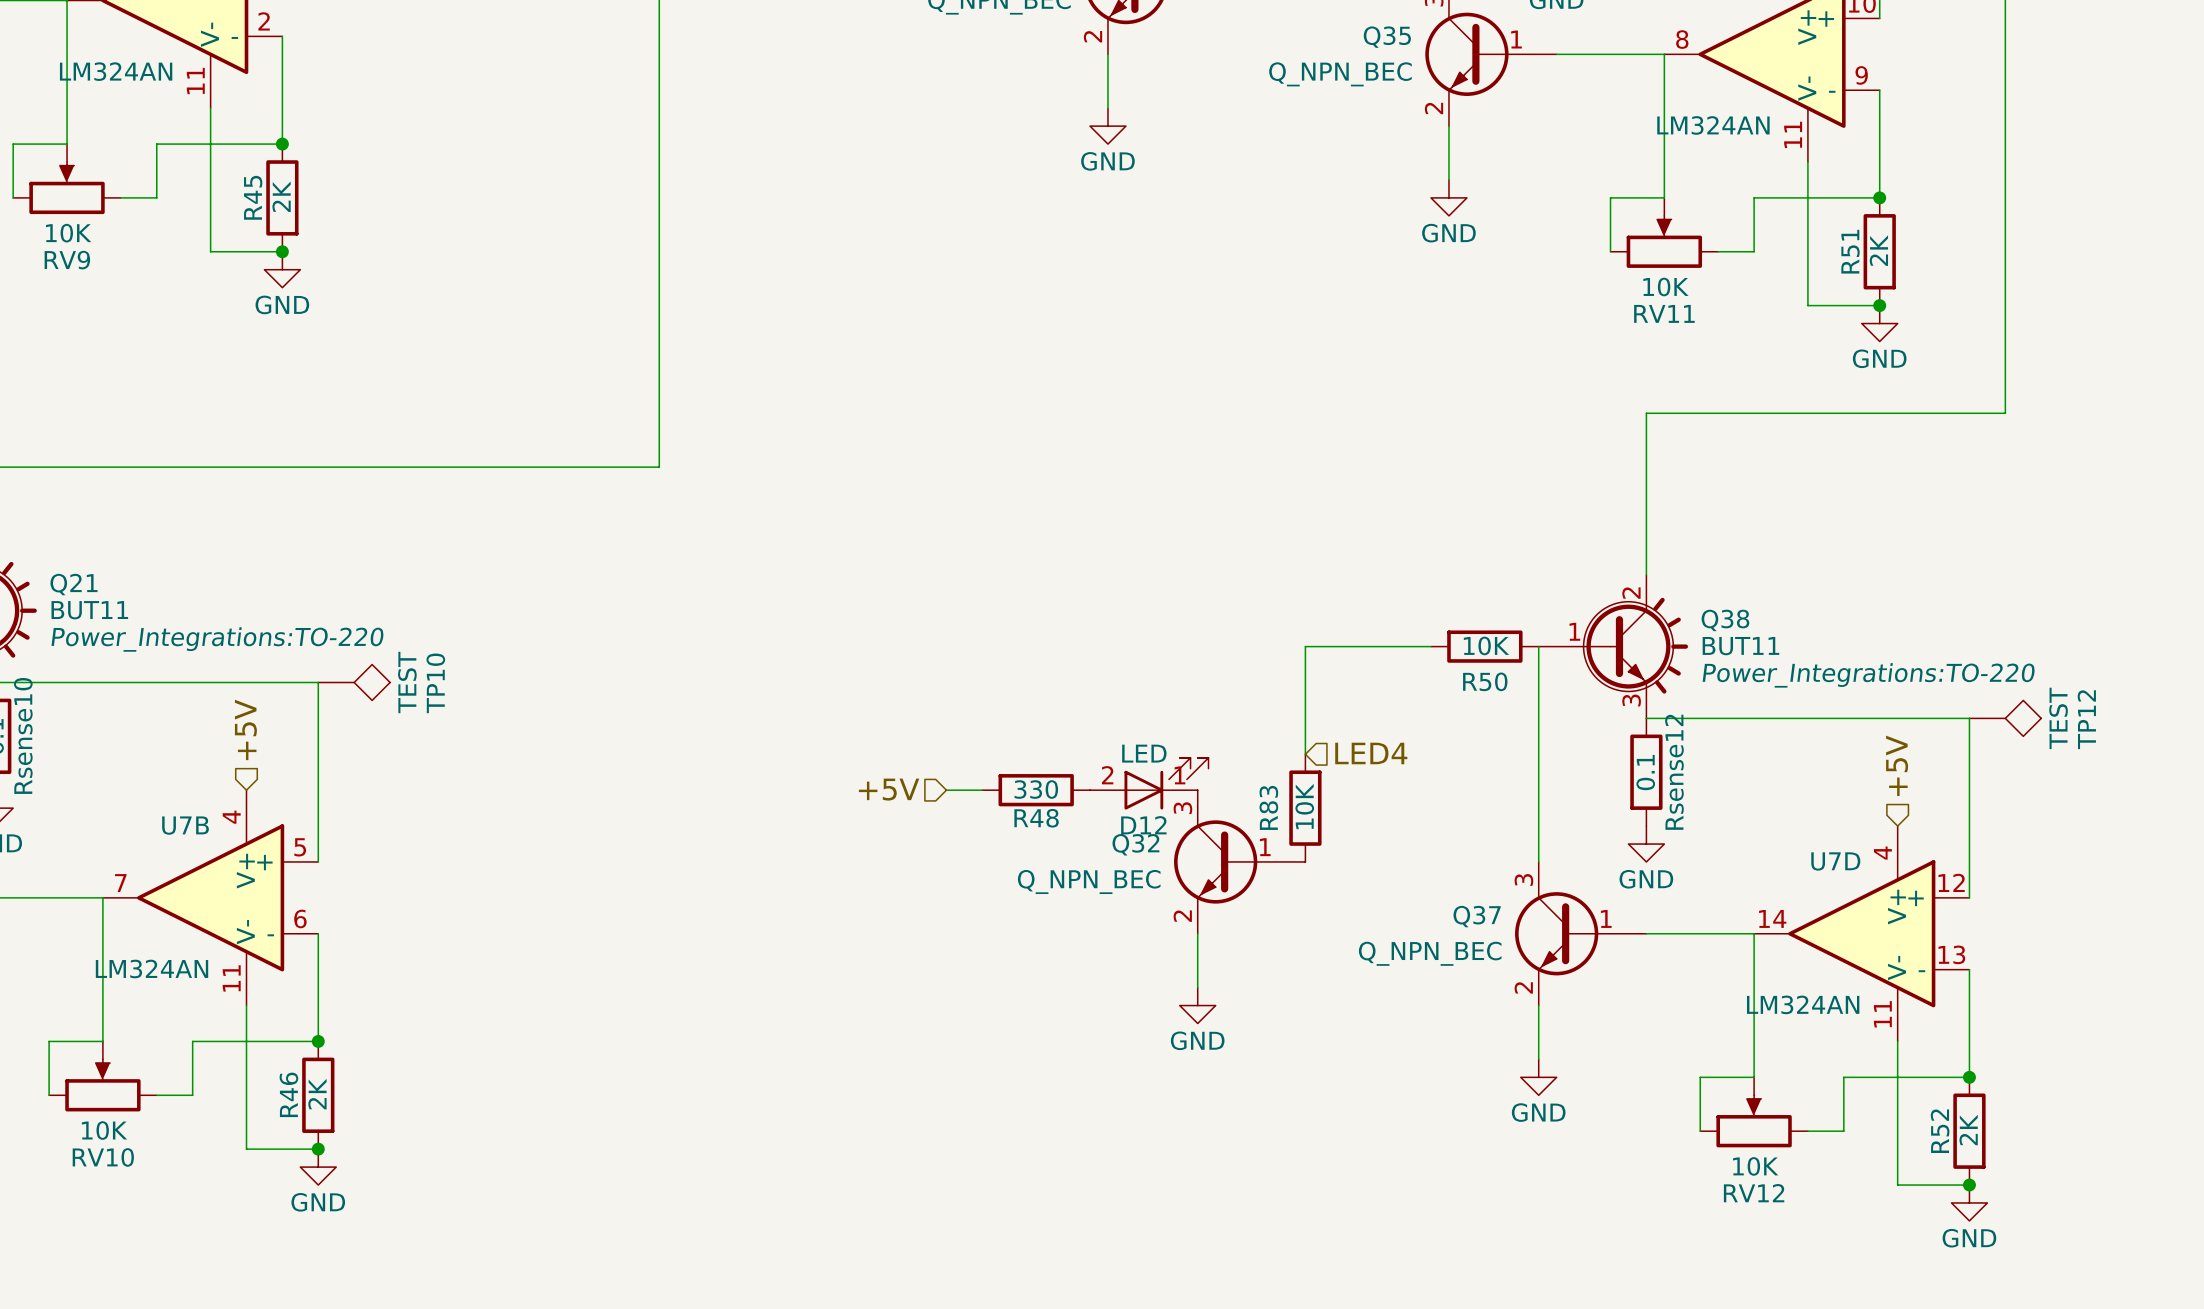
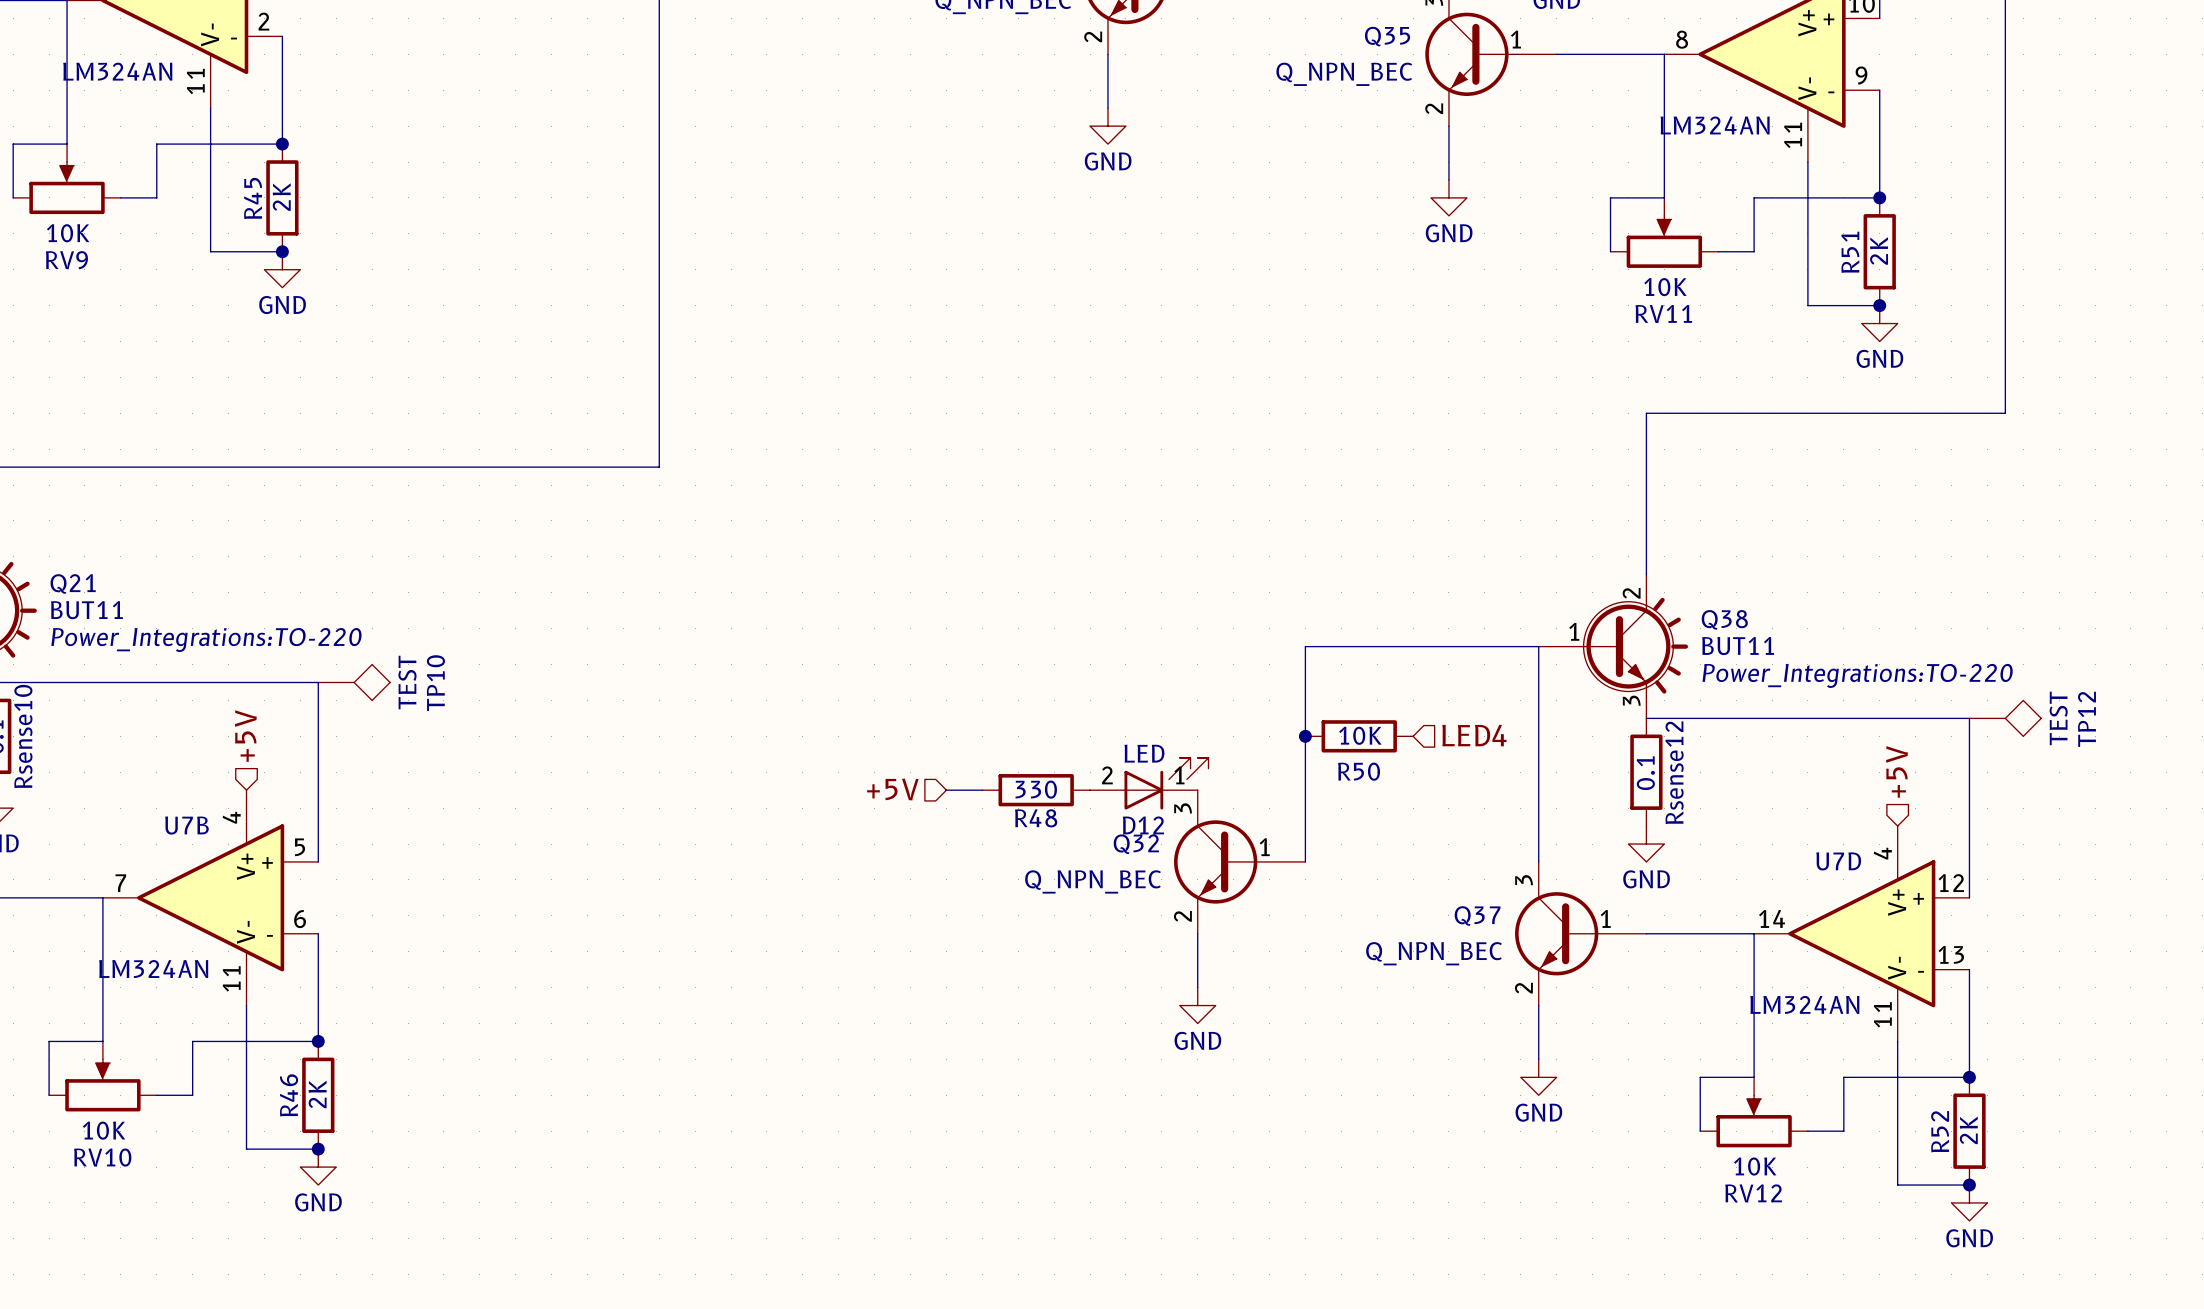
wire: none -> (1431, 646) (1538, 646)
R50 position: (1484, 646) -> (1359, 736)
junction: none -> (1305, 736)
hierarchical label position: LED4 (1371, 753) -> LED4 (1474, 735)
wire: none -> (1305, 754) (1305, 861)
R83: 10K (1305, 808) -> none

